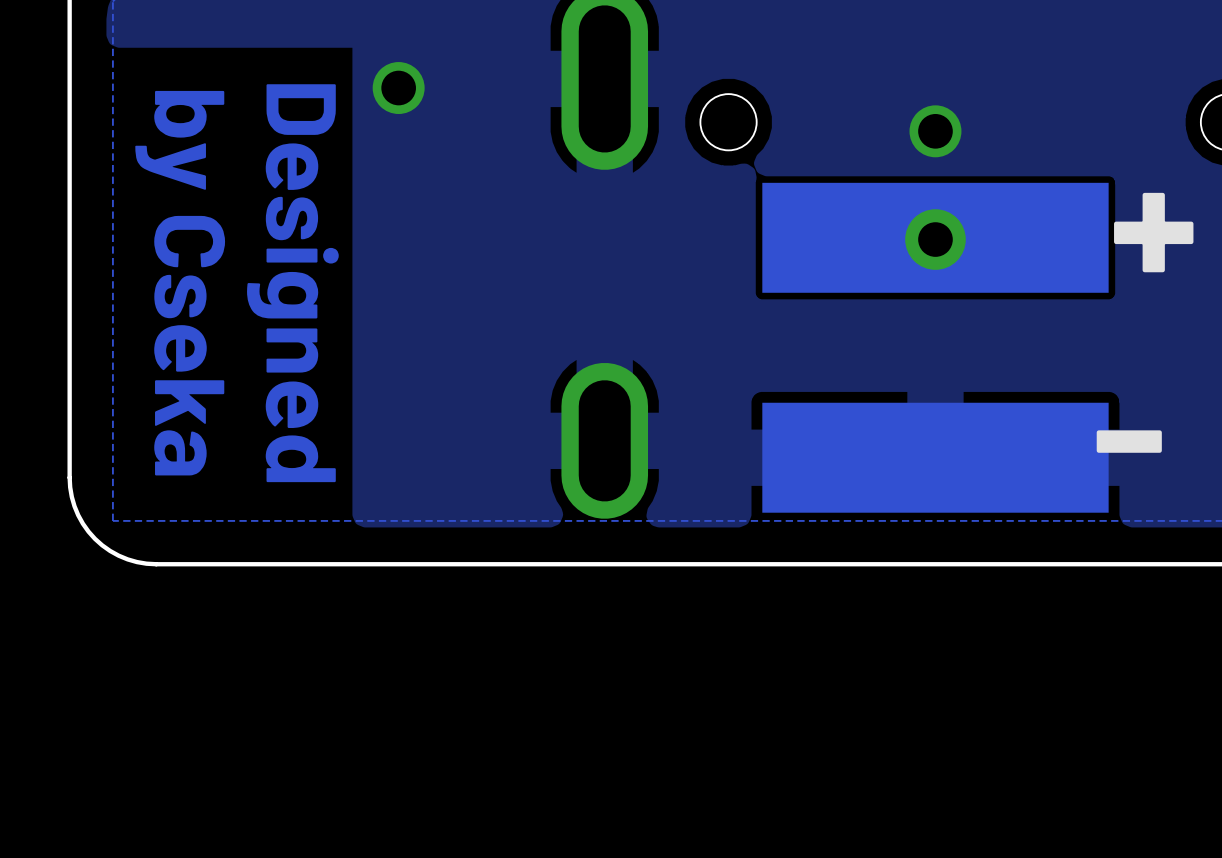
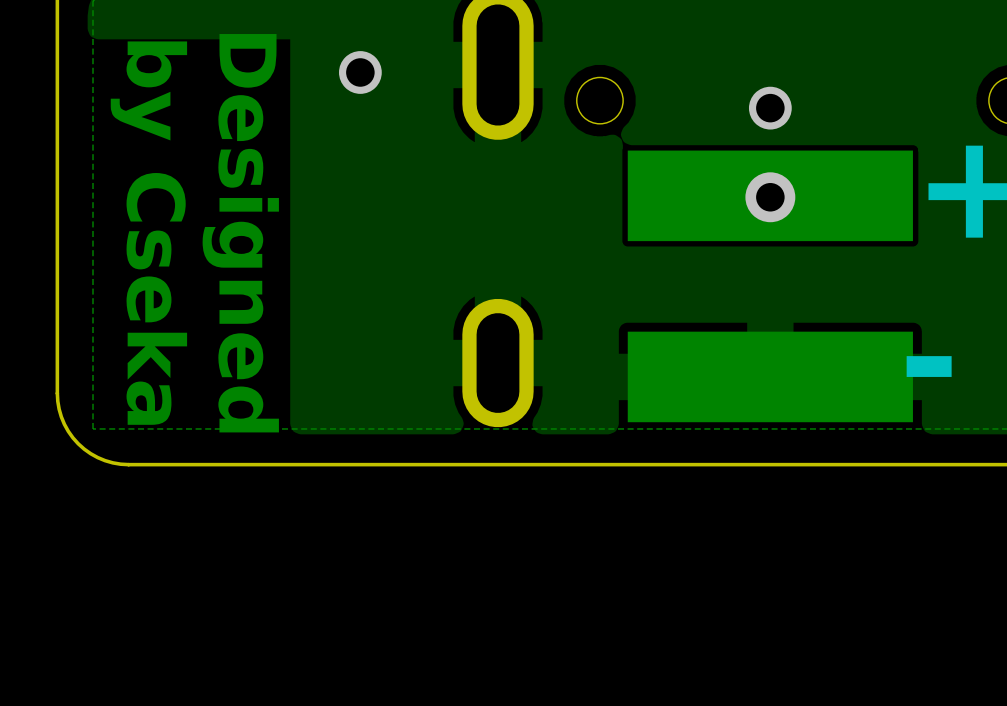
via position: (398, 88) -> (360, 72)

